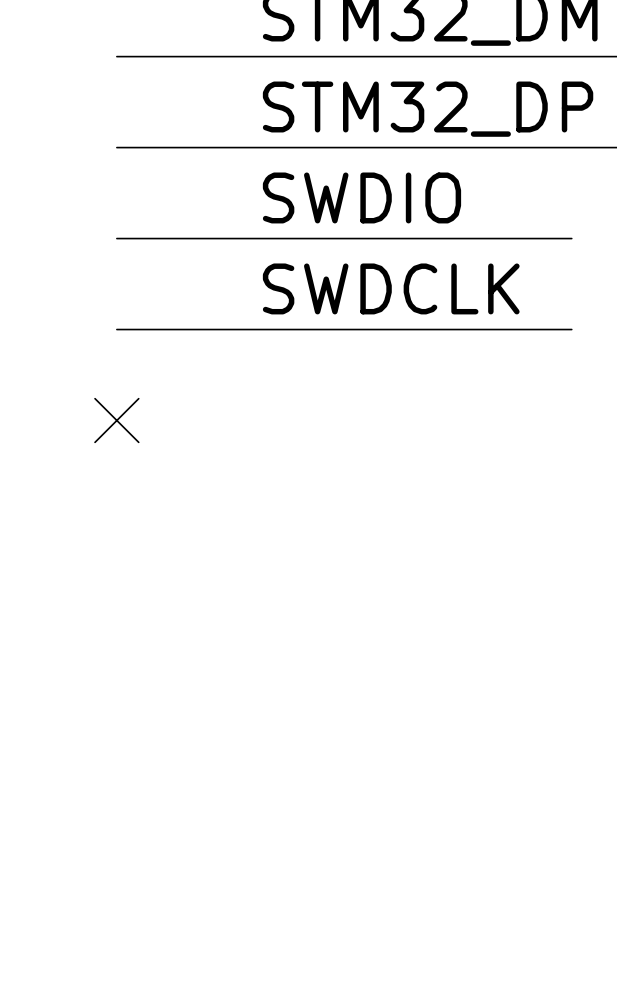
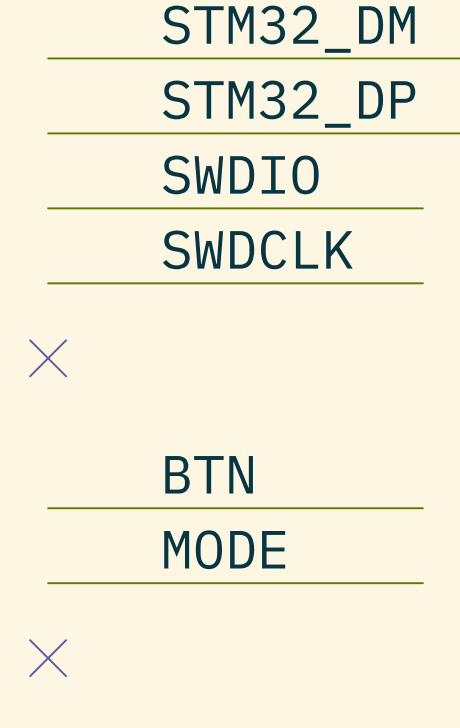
label: none -> BTN (209, 474)
wire: none -> (48, 508) (422, 508)
label: none -> MODE (224, 549)
wire: none -> (48, 583) (422, 583)
no-connect mark: none -> (48, 658)

